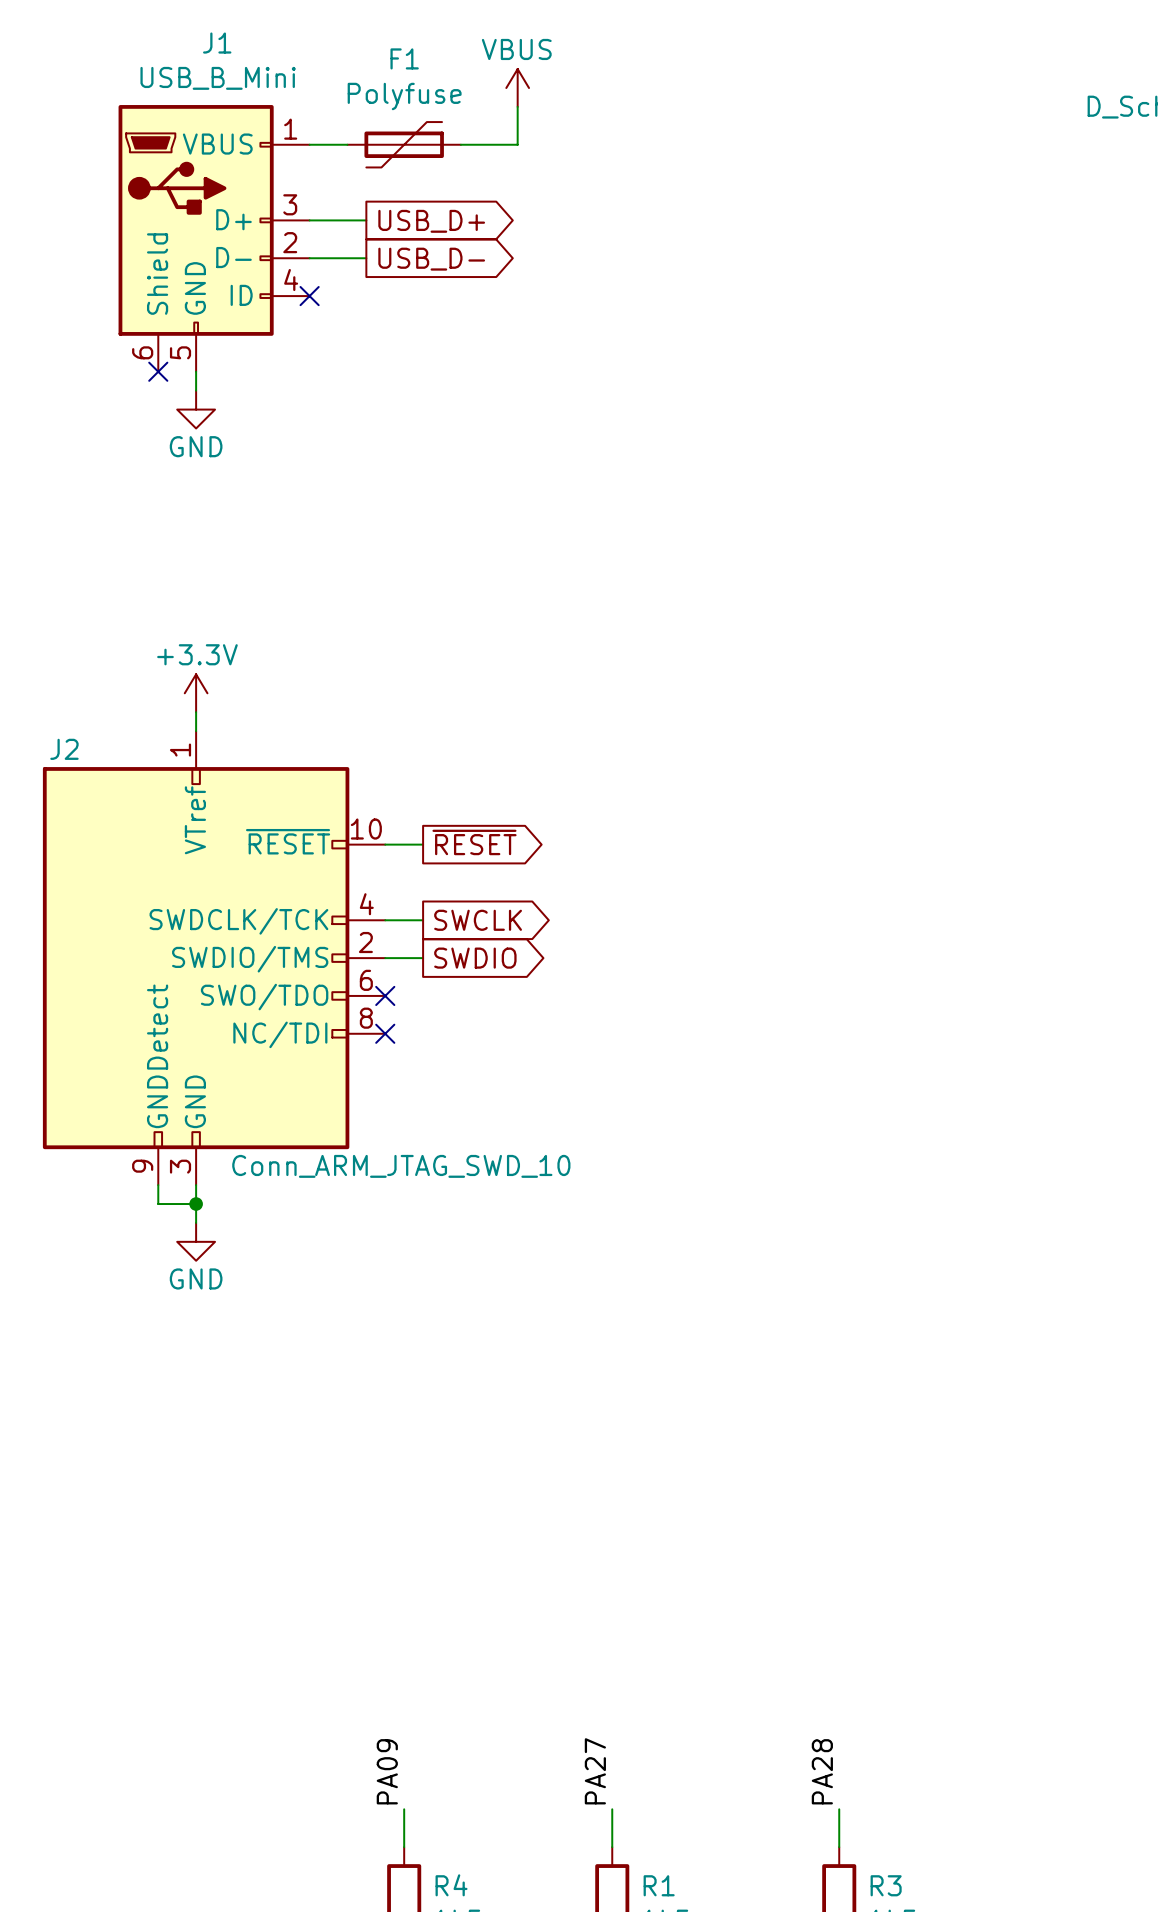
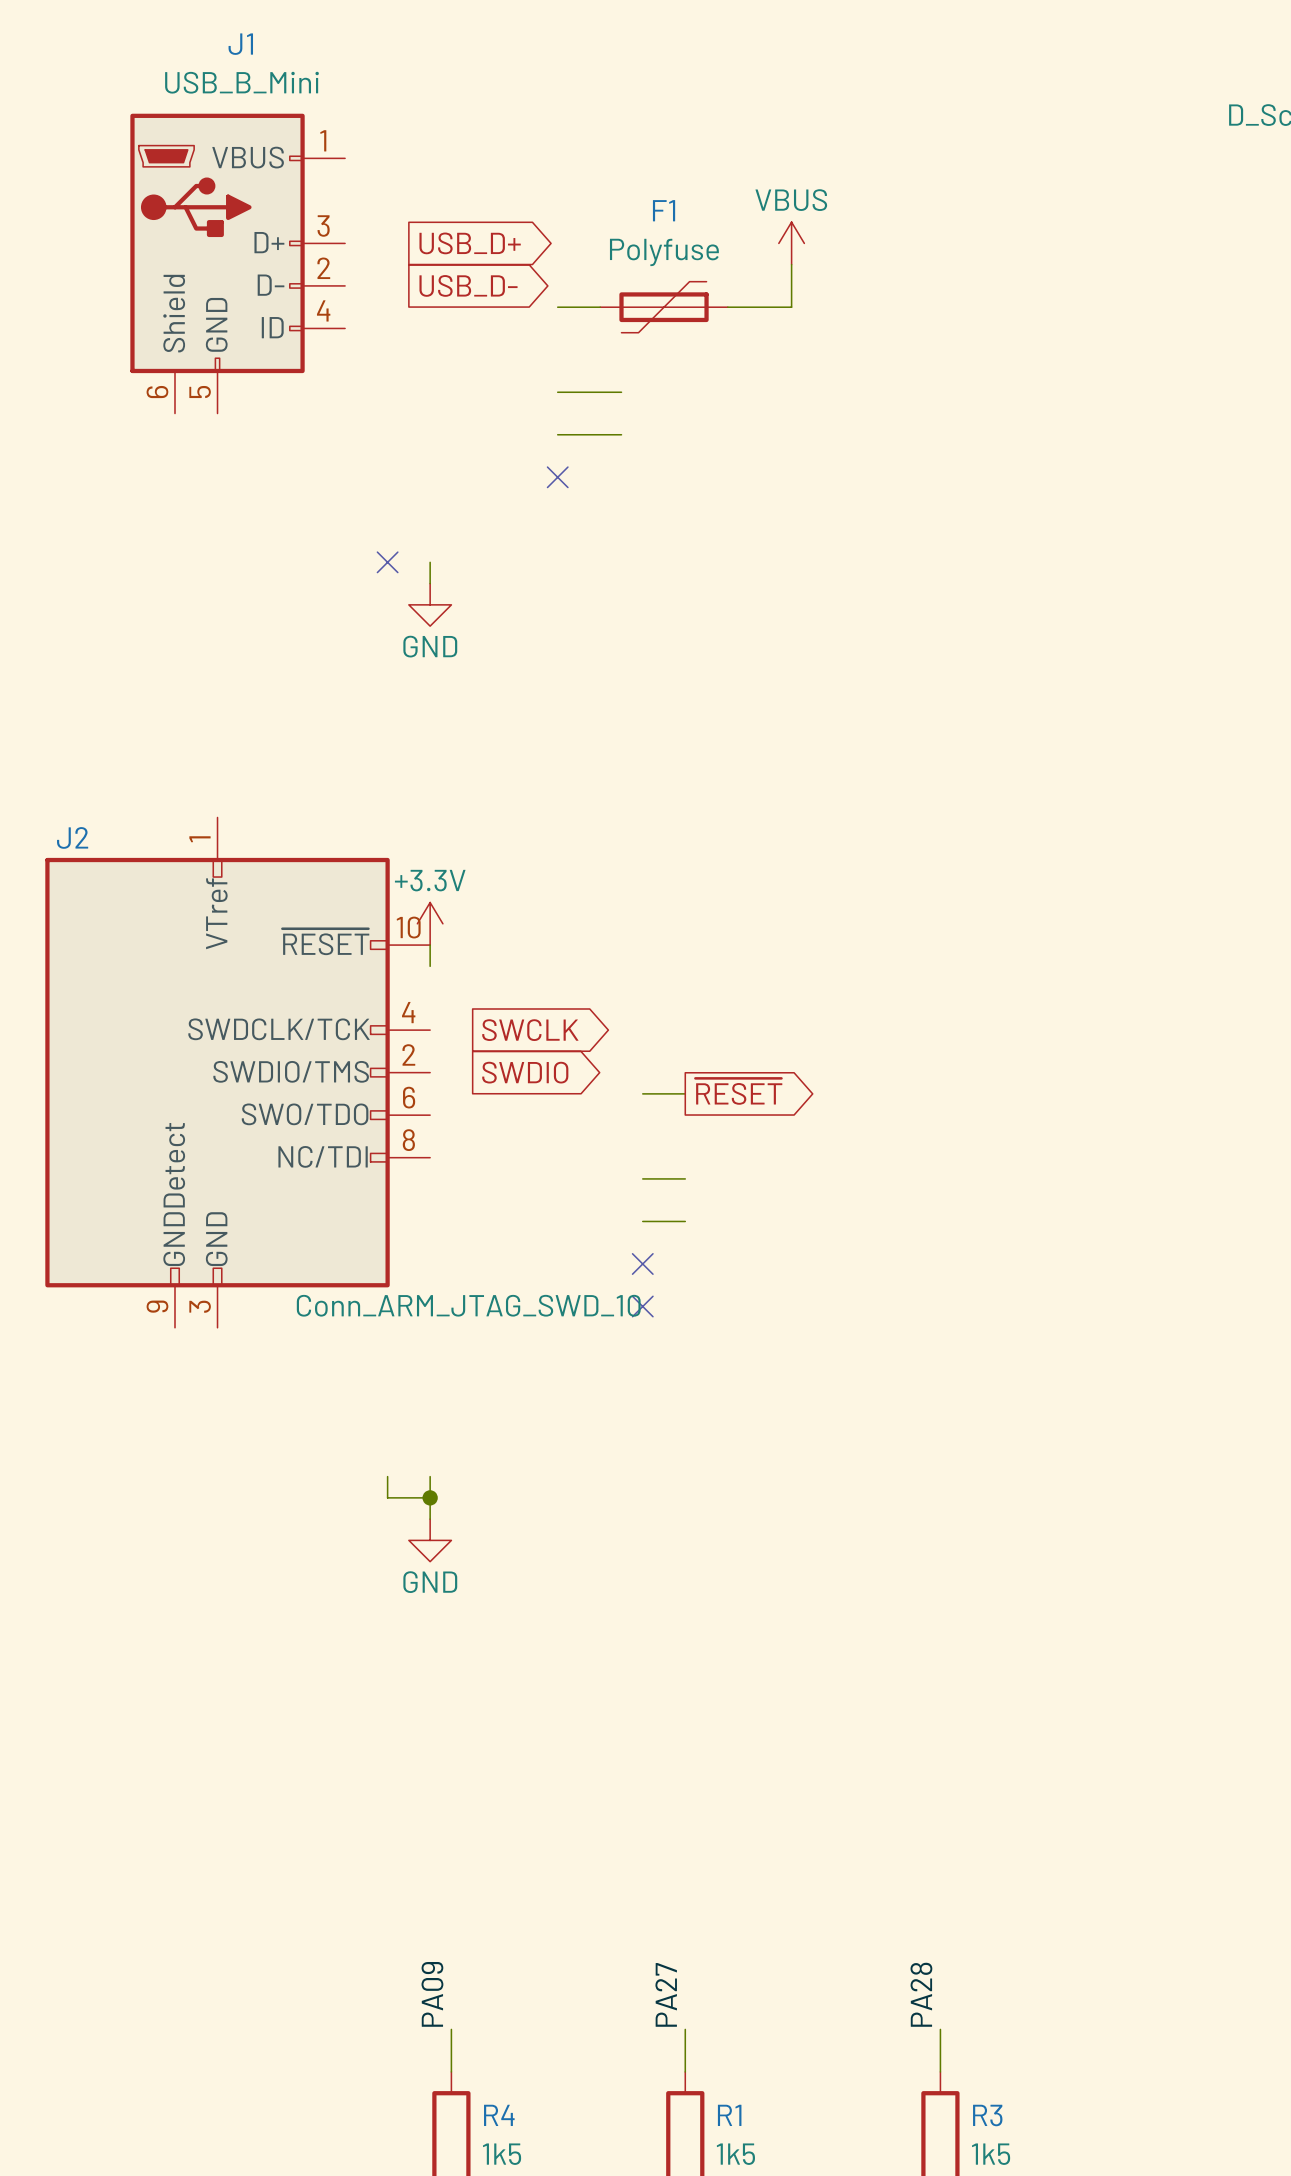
power symbol position: VBUS (517, 88) -> VBUS (791, 243)
wire: (517, 106) (517, 144) (460, 144) -> (791, 264) (791, 307) (727, 307)
wire: (309, 144) (347, 144) -> (557, 307) (600, 307)
F1 position: (404, 144) -> (664, 307)
wire: (309, 220) (366, 220) -> (557, 392) (621, 392)
wire: (309, 258) (366, 258) -> (557, 434) (621, 434)
no-connect mark: (309, 296) -> none
no-connect mark: (158, 371) -> none
wire: (196, 371) (196, 390) -> (430, 562) (430, 583)
power symbol position: GND (196, 409) -> GND (430, 604)
no-connect mark: none -> (557, 477)
no-connect mark: none -> (387, 562)
power symbol position: +3.3V (196, 693) -> +3.3V (430, 923)
wire: (196, 712) (196, 731) -> none
global label position: ~{RESET} (474, 842) -> ~{RESET} (738, 1091)
wire: (385, 844) (423, 844) -> (430, 945) (430, 966)
wire: (385, 920) (423, 920) -> (642, 1178) (685, 1178)
wire: (385, 958) (423, 958) -> (642, 1221) (685, 1221)
wire: none -> (642, 1093) (685, 1093)
no-connect mark: (385, 995) -> none
no-connect mark: (385, 1033) -> none
no-connect mark: none -> (642, 1263)
no-connect mark: none -> (642, 1306)
wire: (158, 1185) (158, 1204) (196, 1204) -> (387, 1476) (387, 1497) (430, 1497)
wire: (196, 1185) (196, 1222) -> (430, 1476) (430, 1519)
junction: (196, 1204) -> none
power symbol position: GND (196, 1241) -> GND (430, 1540)
junction: none -> (430, 1497)

